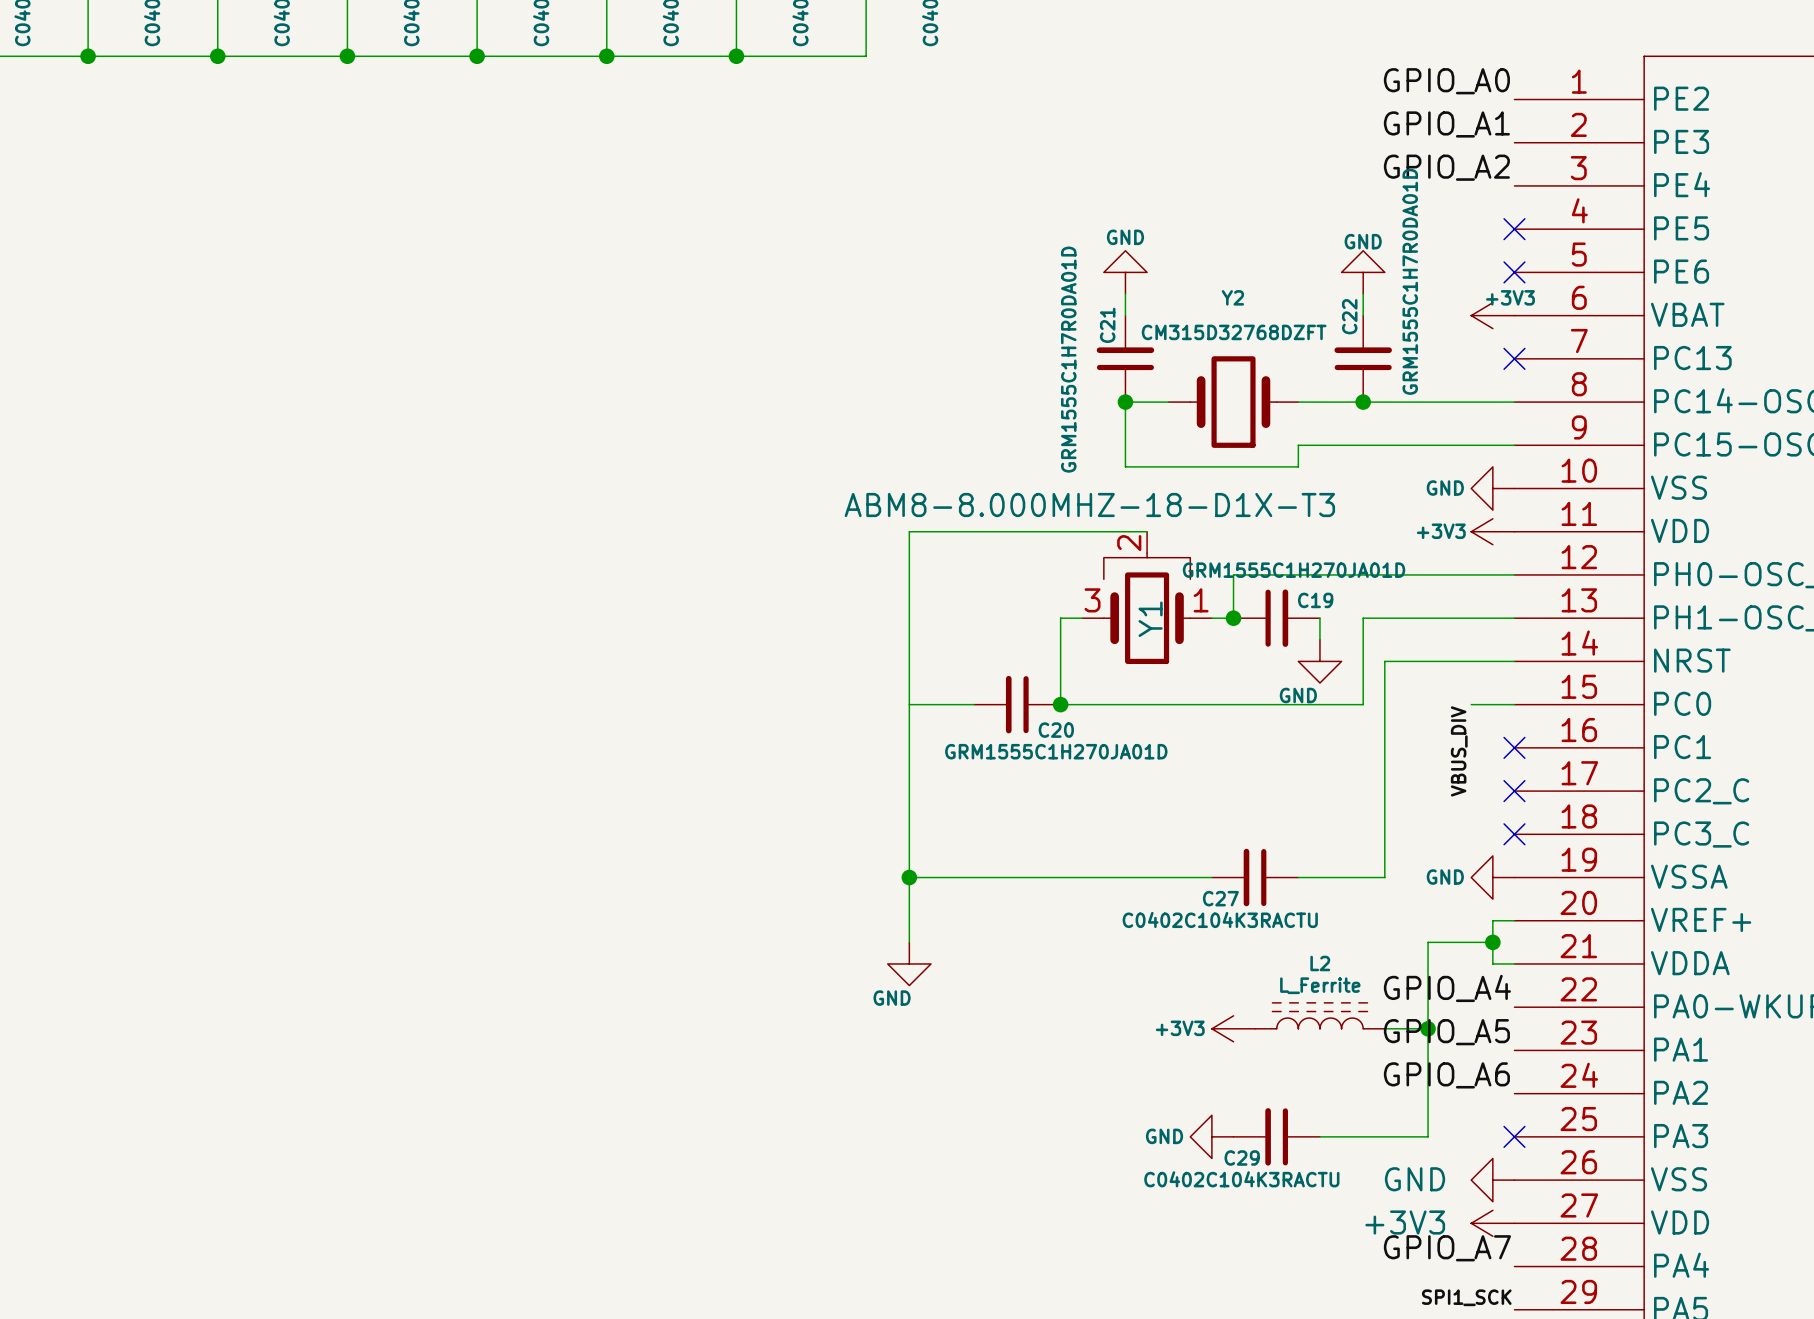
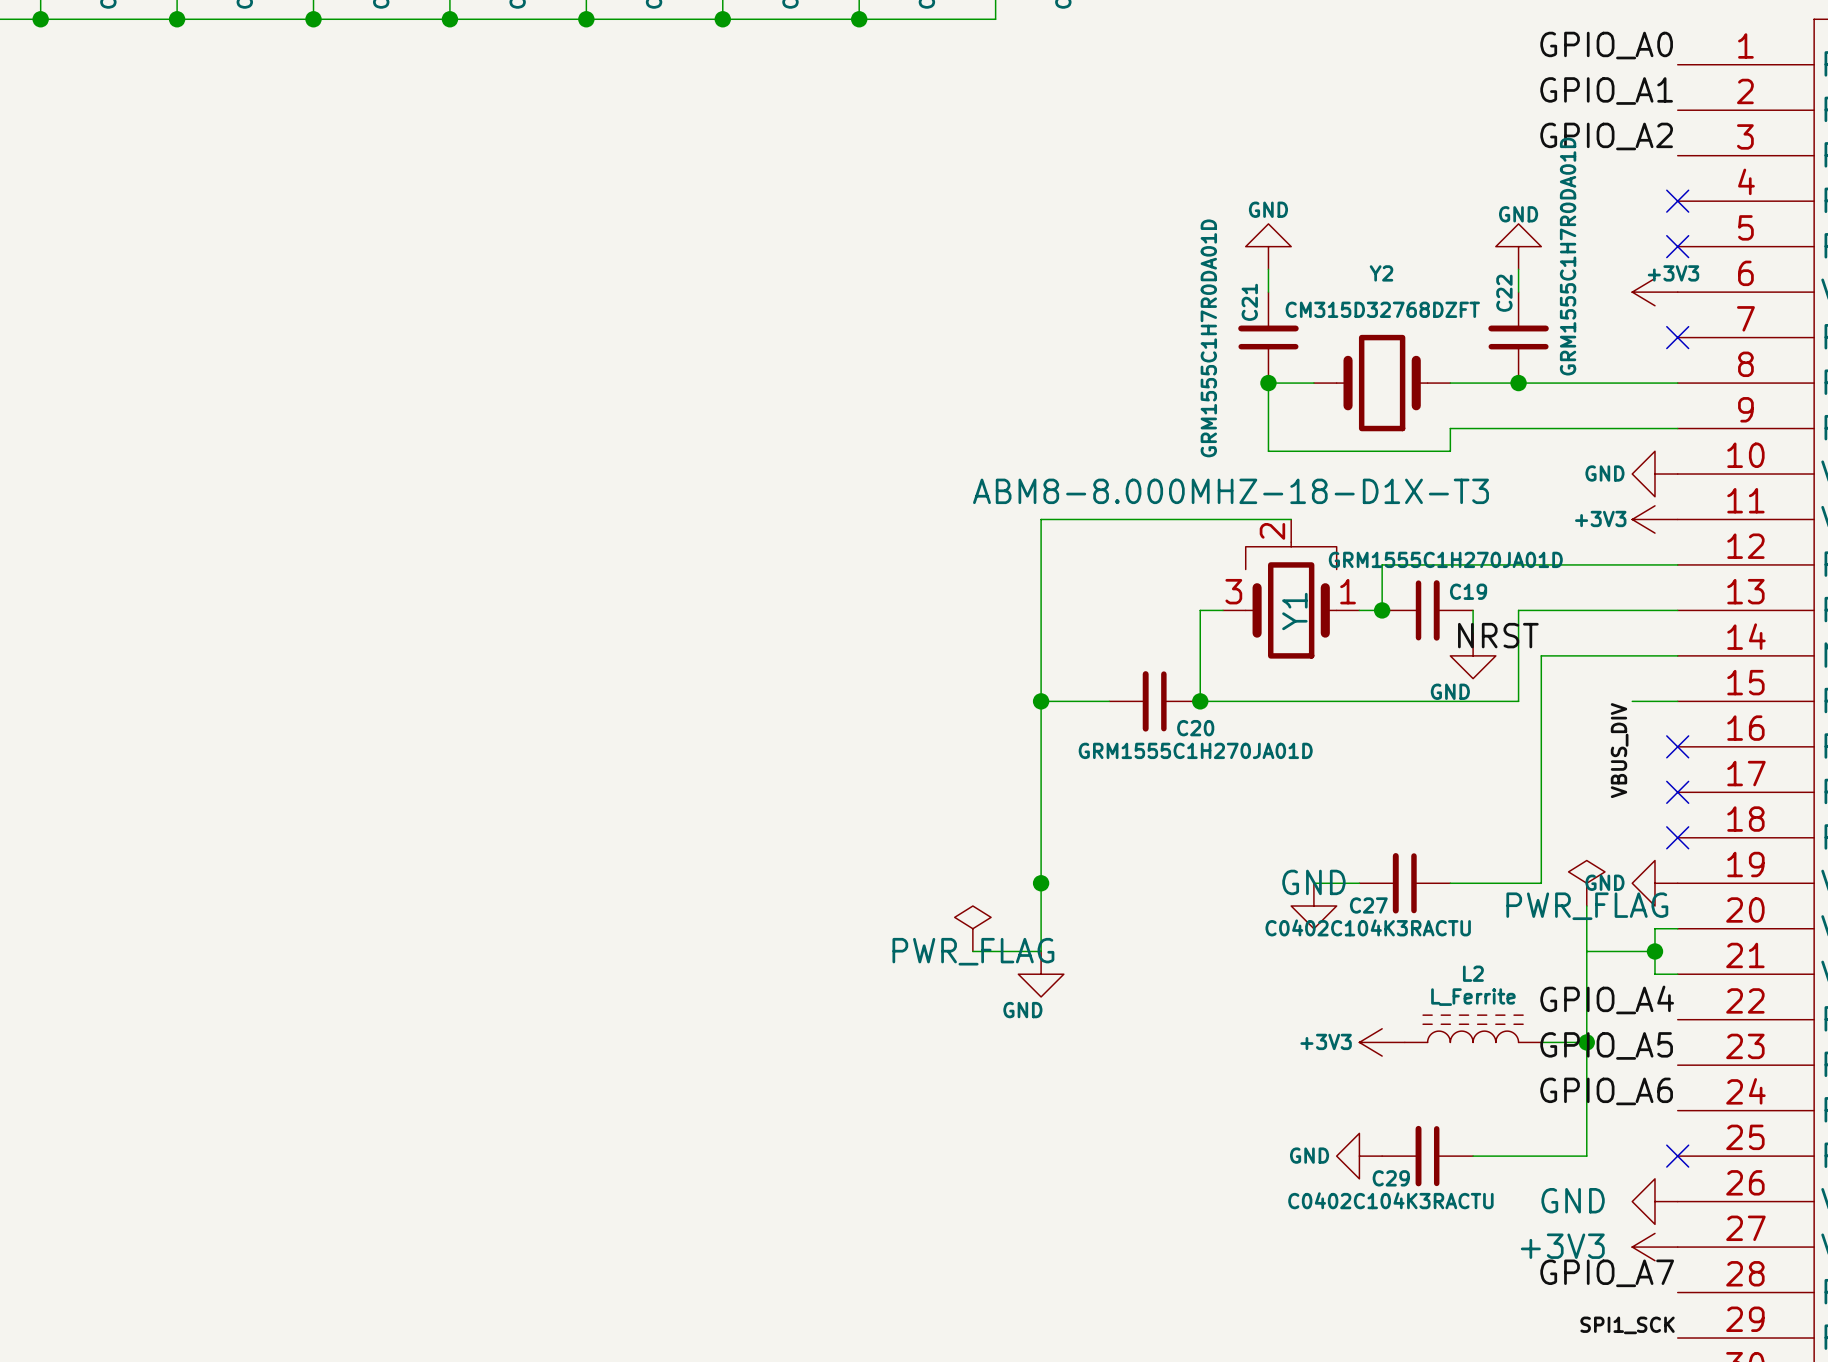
label: none -> NRST (1498, 635)
junction: none -> (1041, 701)
wire: (909, 877) (1168, 877) -> none
power symbol: none -> PWR_FLAG (1586, 883)
power symbol: none -> GND (1313, 906)
wire: none -> (1586, 906) (1586, 951)
power symbol: none -> PWR_FLAG (972, 928)
wire: none -> (972, 951) (1041, 951)

